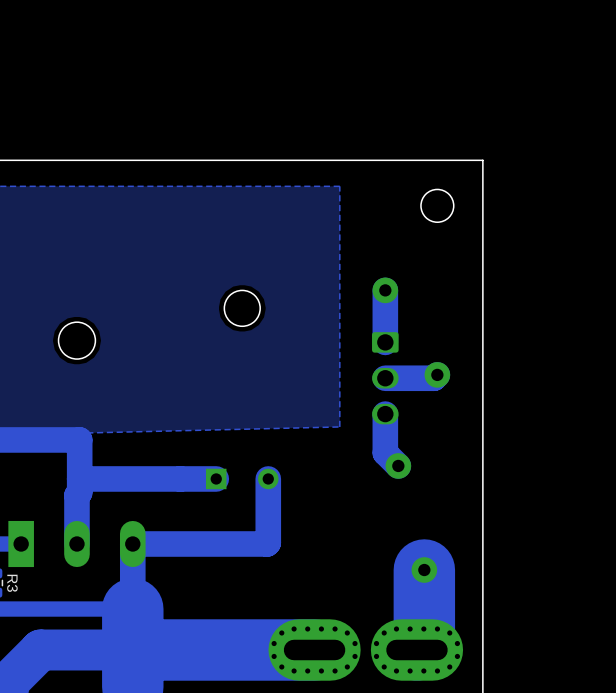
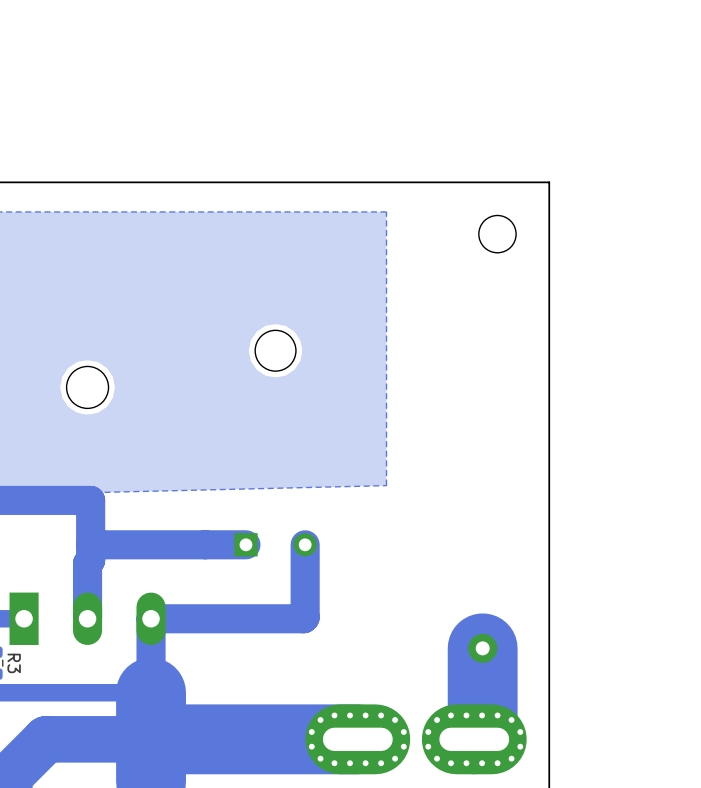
bottom track: (385, 290) (385, 342) -> none
part: (385, 290) -> none
bottom track: (437, 374) (434, 378) (385, 378) -> none
part: (437, 374) -> none
part: (385, 378) -> none
bottom track: (385, 414) (385, 452) (398, 465) -> none
part: (398, 465) -> none

